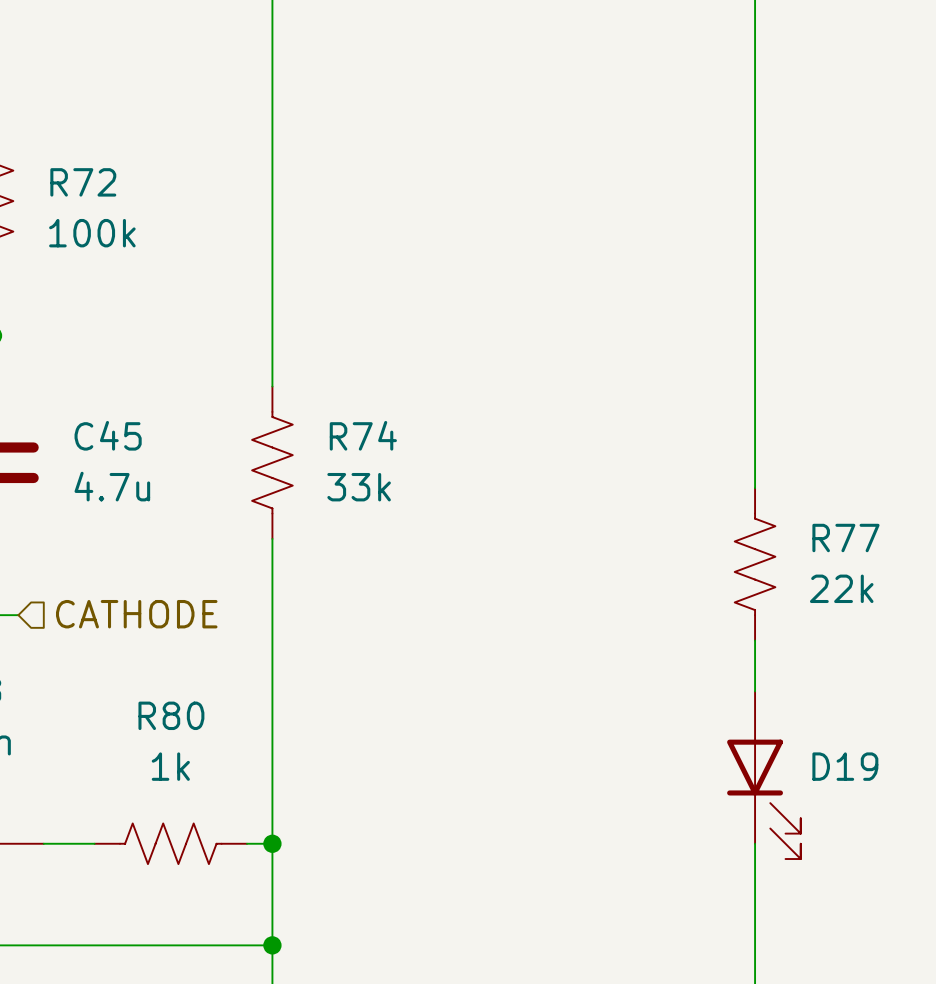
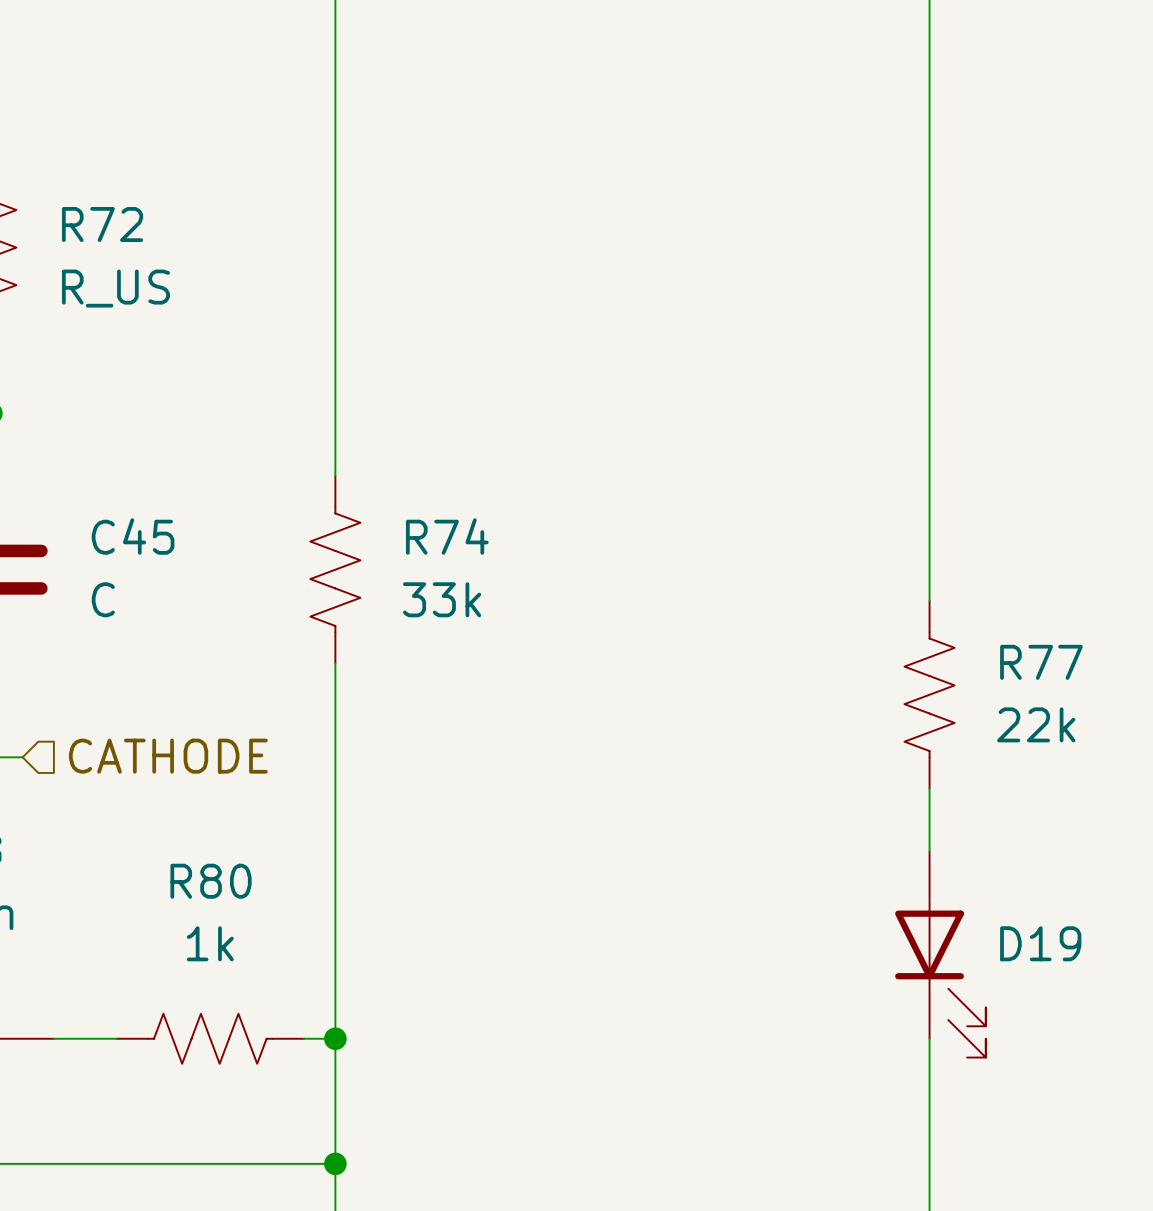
R72 value: 100k (92, 233) -> R_US (115, 288)
C45 value: 4.7u (112, 486) -> C (103, 599)

